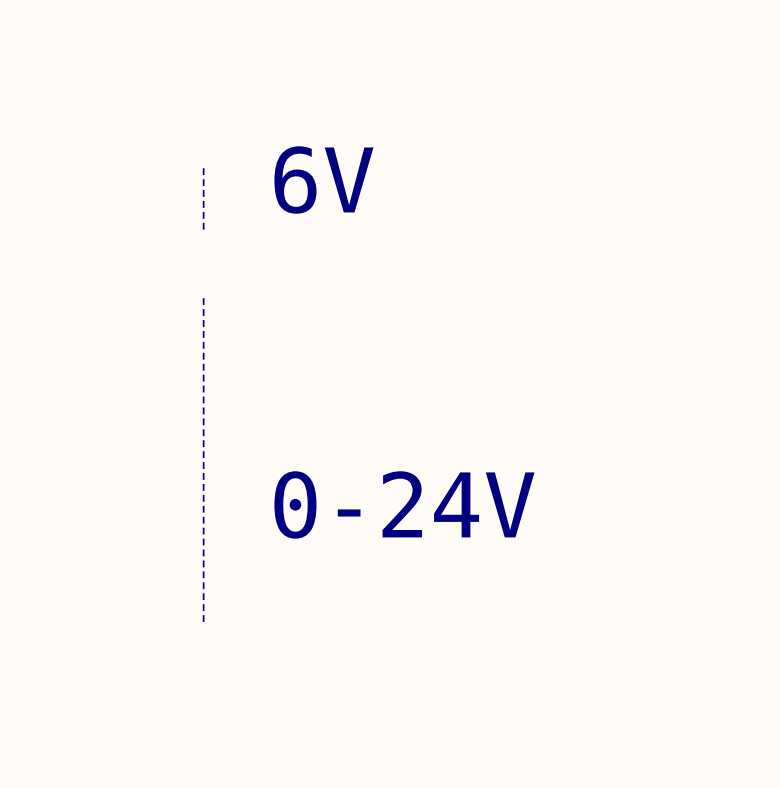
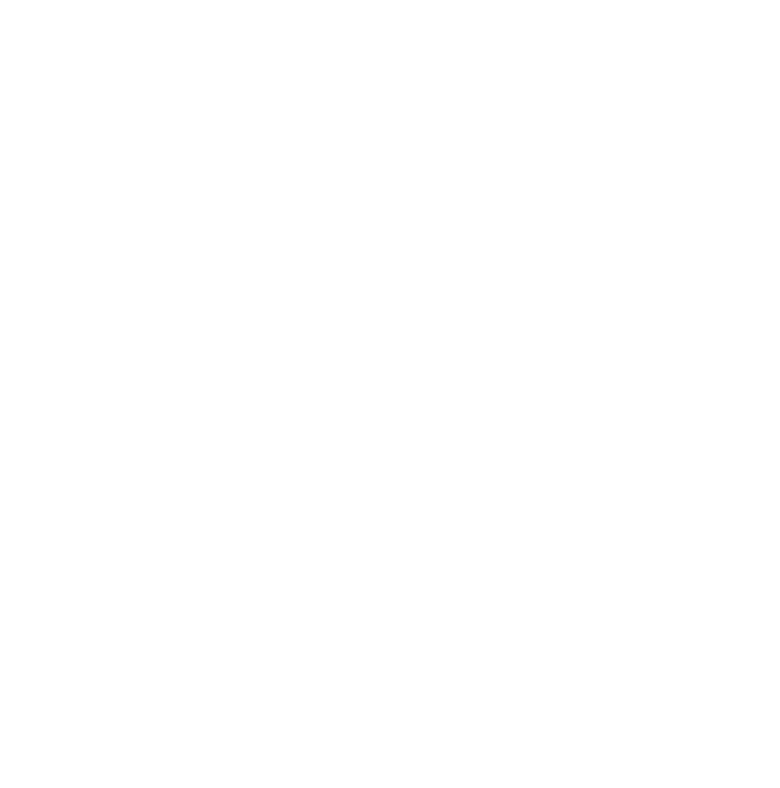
line: (203, 168) (203, 233) -> none
text: 6V (323, 180) -> none
line: (203, 298) (203, 623) -> none
text: 0-24V (404, 504) -> none

